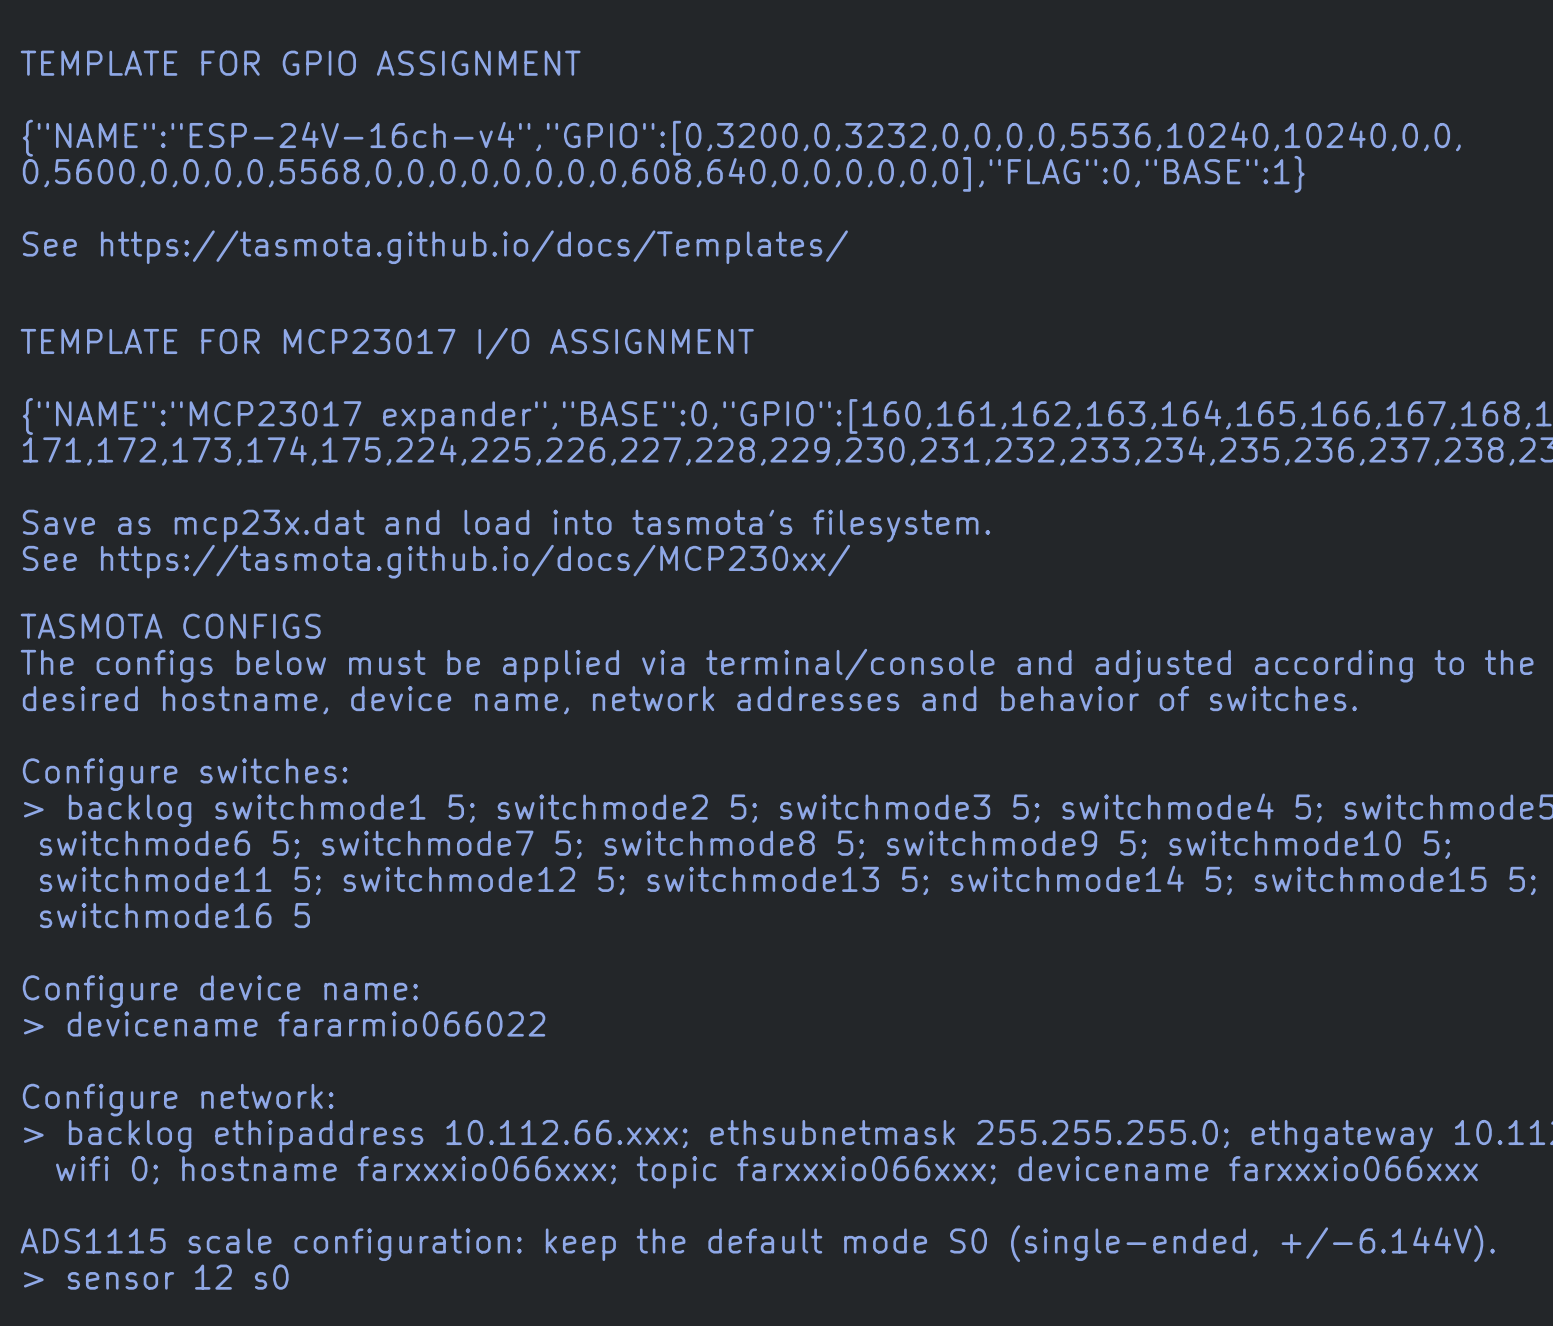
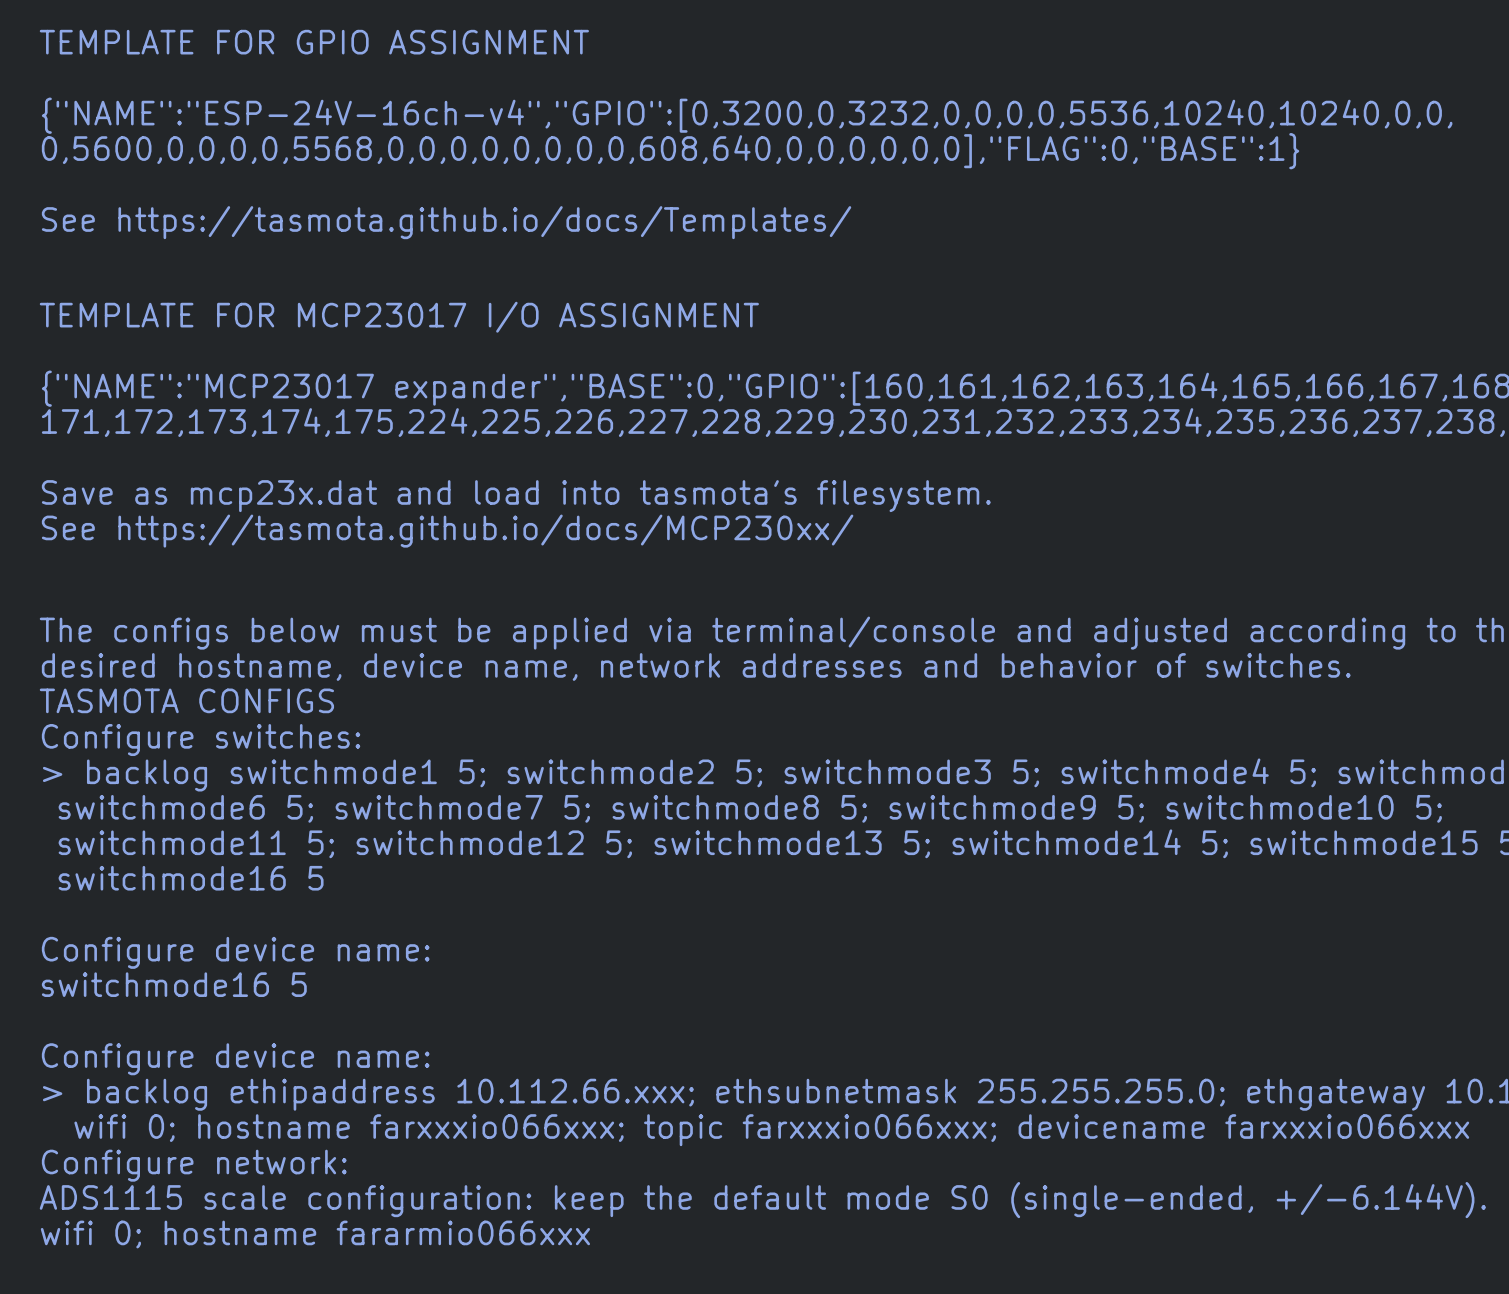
text position: TASMOTA CONFIGS (170, 626) -> TASMOTA CONFIGS (186, 700)
text: > devicename fararmio066022 (284, 1024) -> switchmode16 5 (174, 984)
text: Configure network: (178, 1100) -> Configure device name: (235, 1059)
text: none -> Configure network: (194, 1165)
text: > sensor 12 s0 (156, 1277) -> wifi 0; hostname fararmio066xxx (315, 1234)

